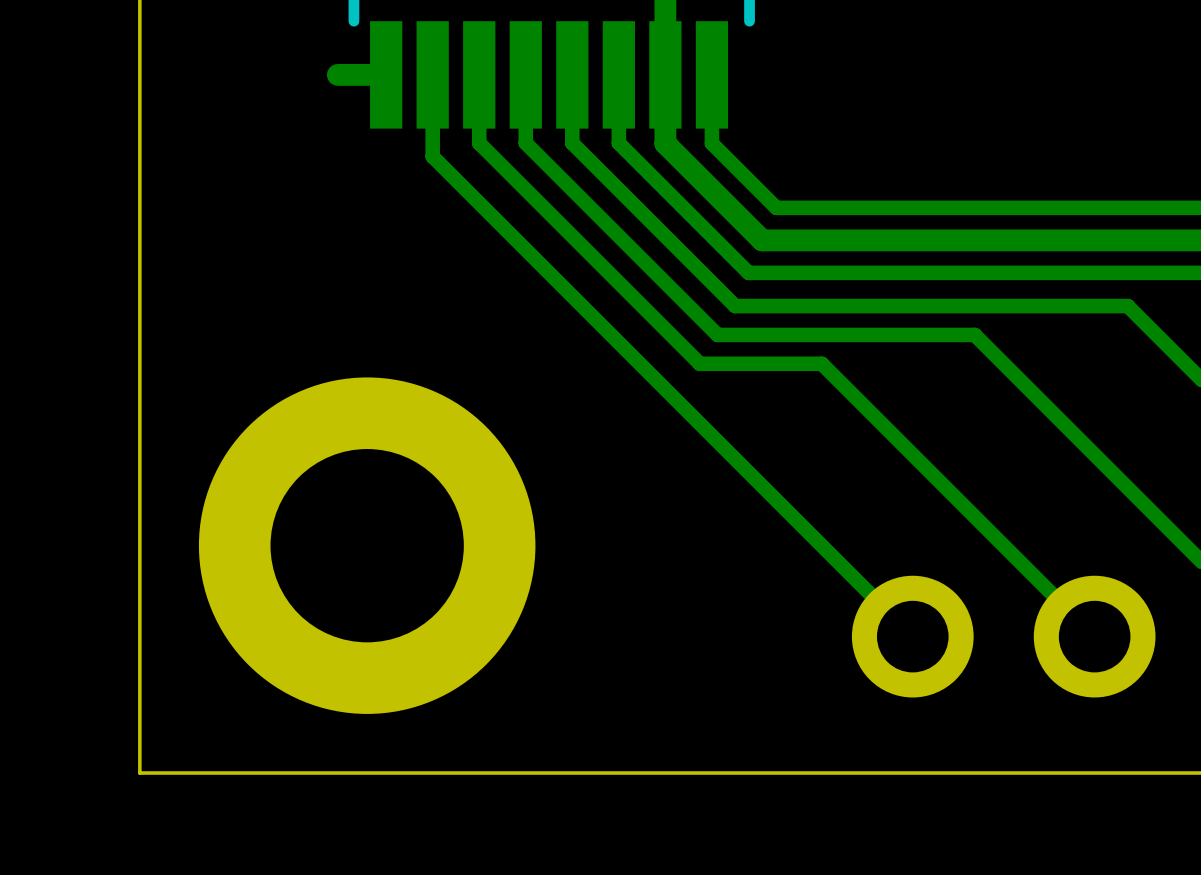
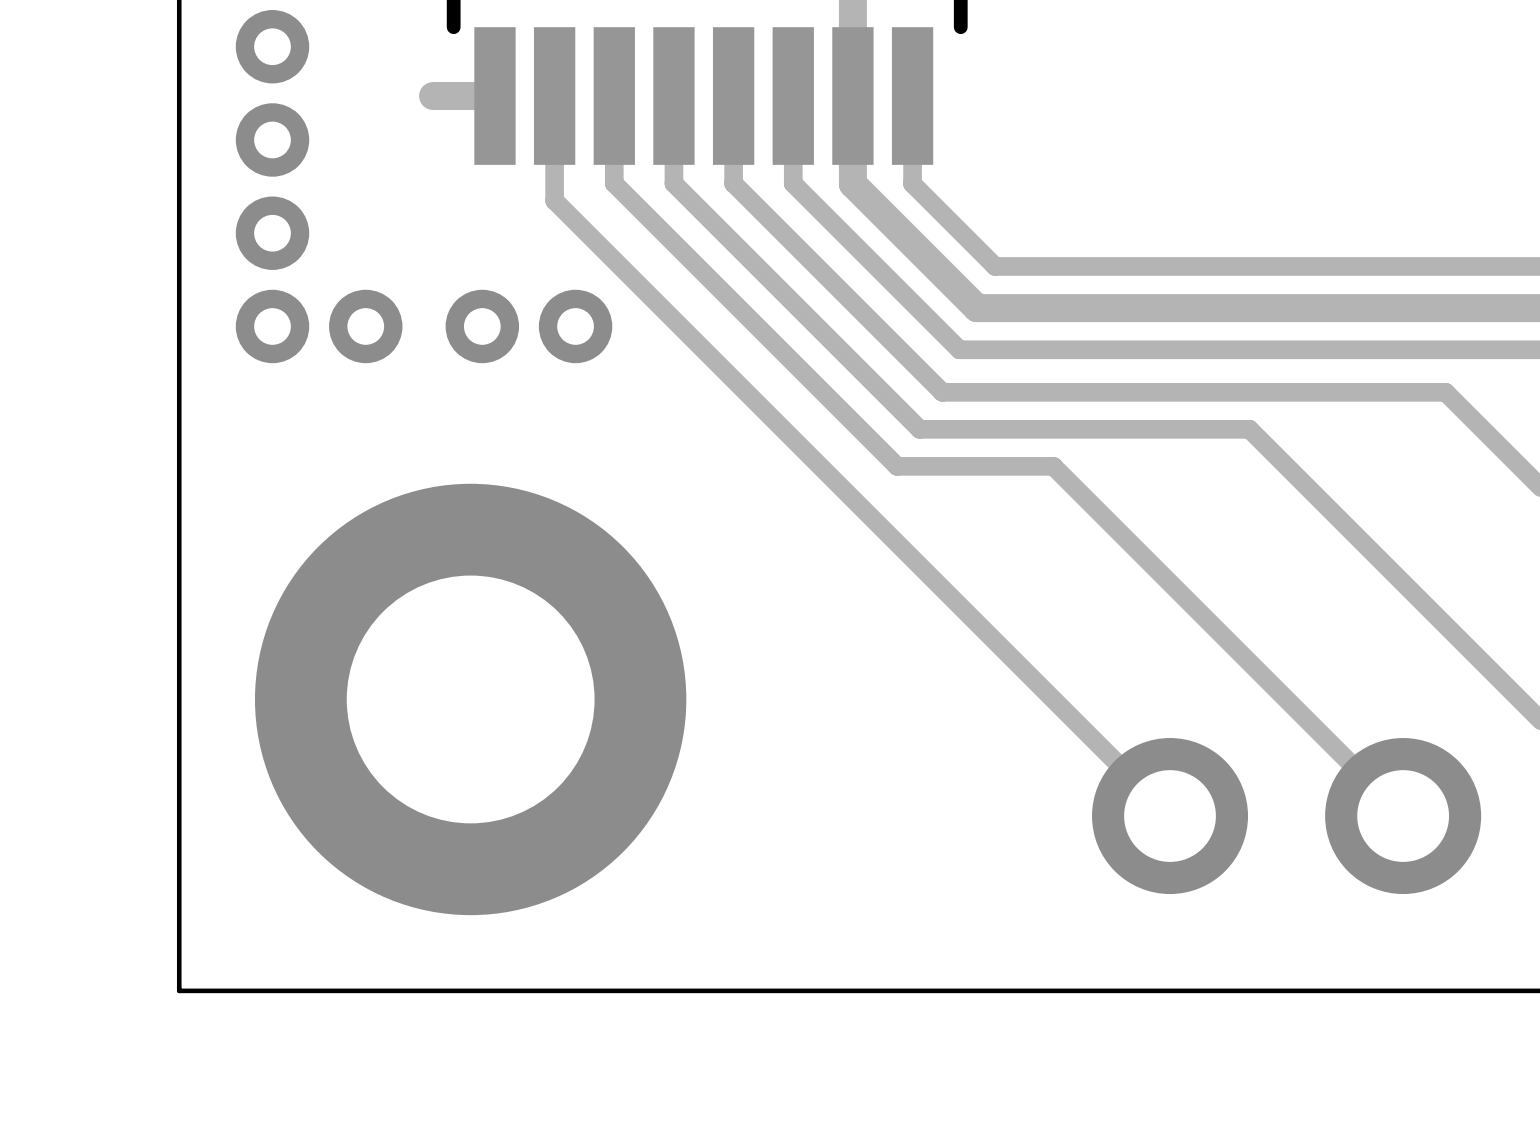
via: none -> (272, 46)
via: none -> (272, 139)
via: none -> (272, 233)
via: none -> (272, 326)
via: none -> (365, 326)
via: none -> (482, 326)
via: none -> (575, 326)

